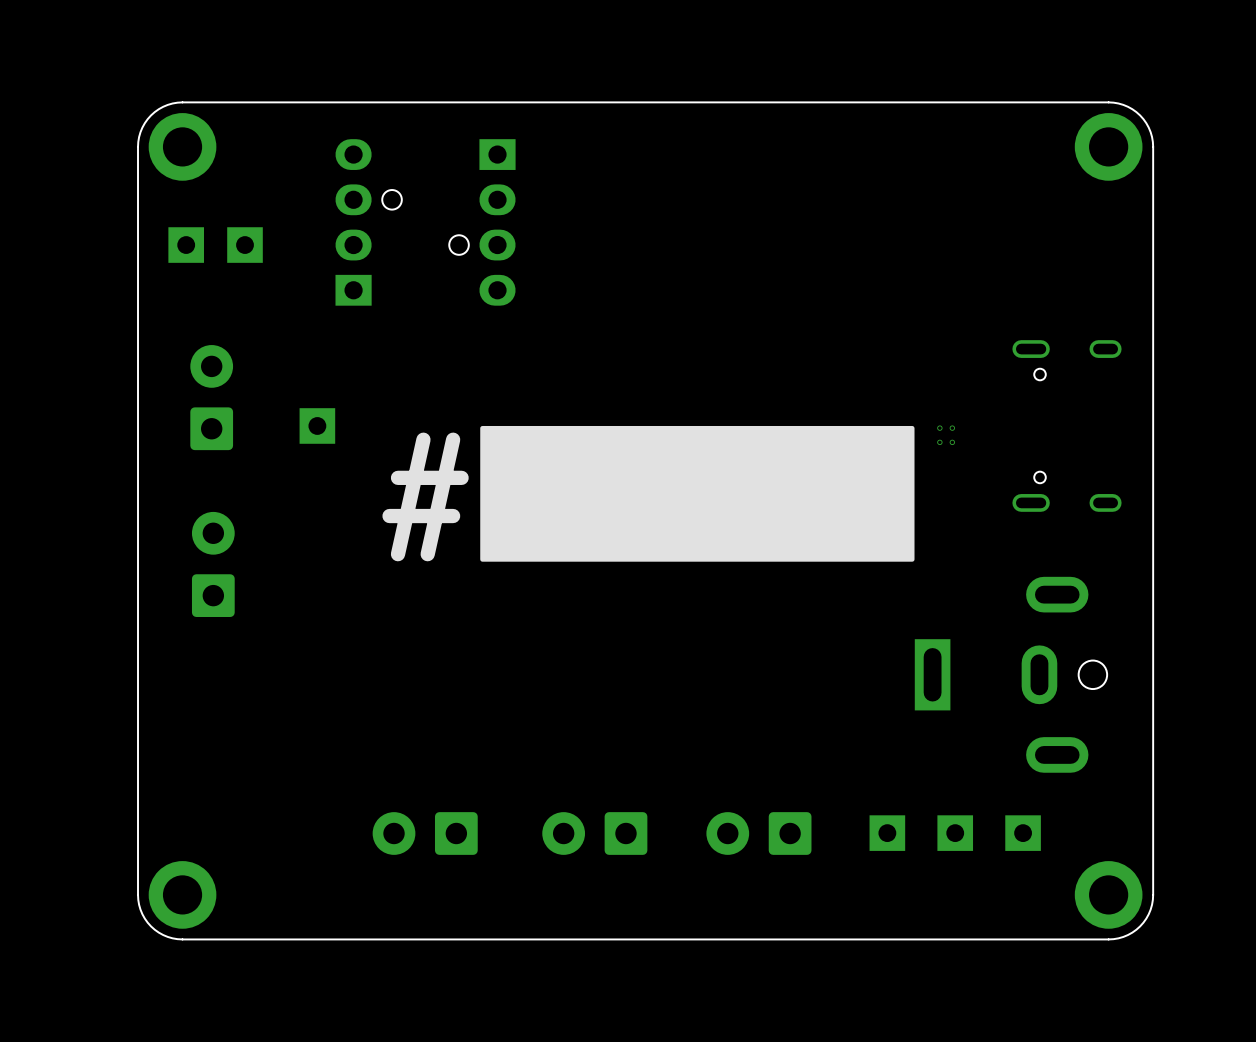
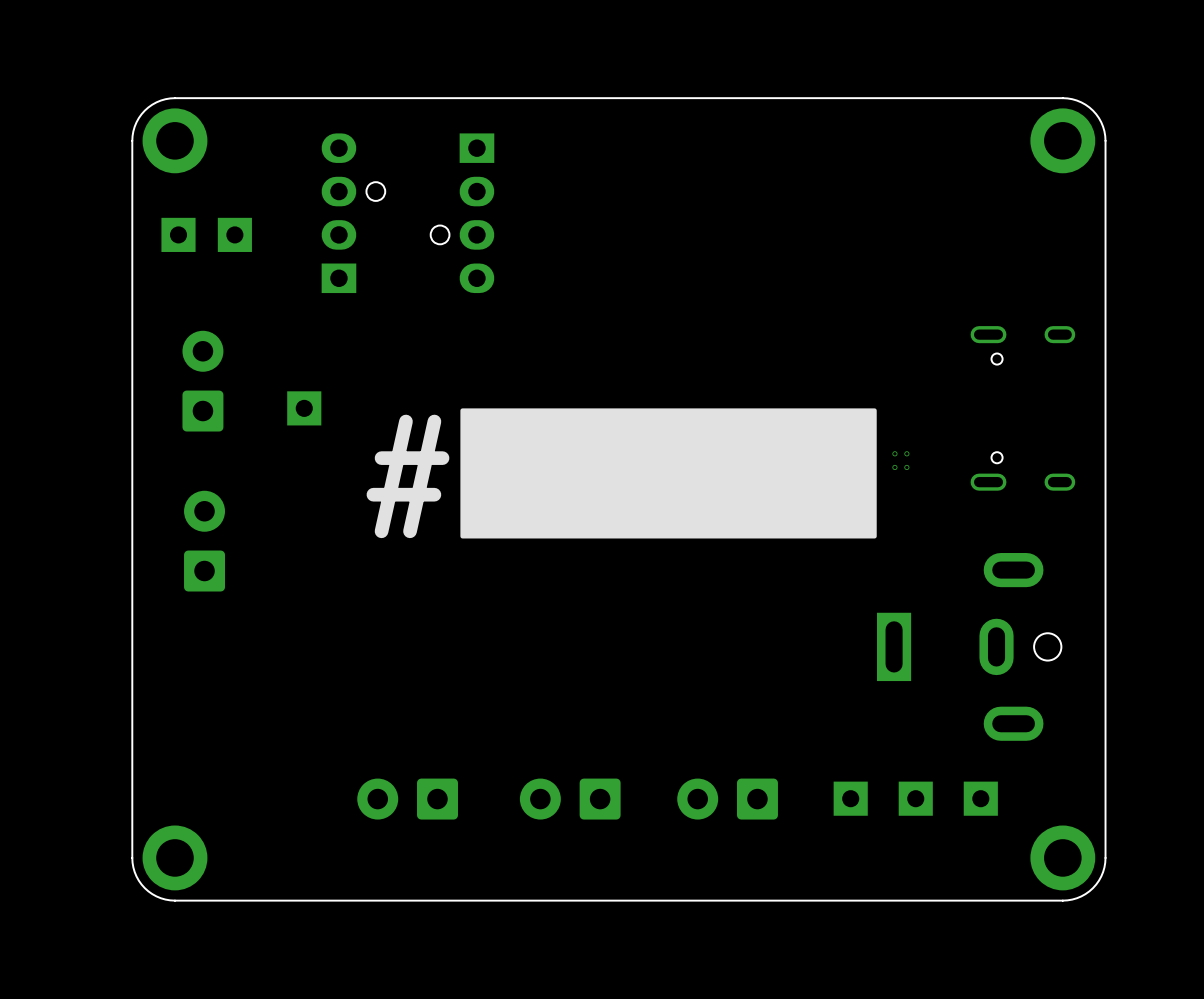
part position: (946, 435) -> (900, 460)

